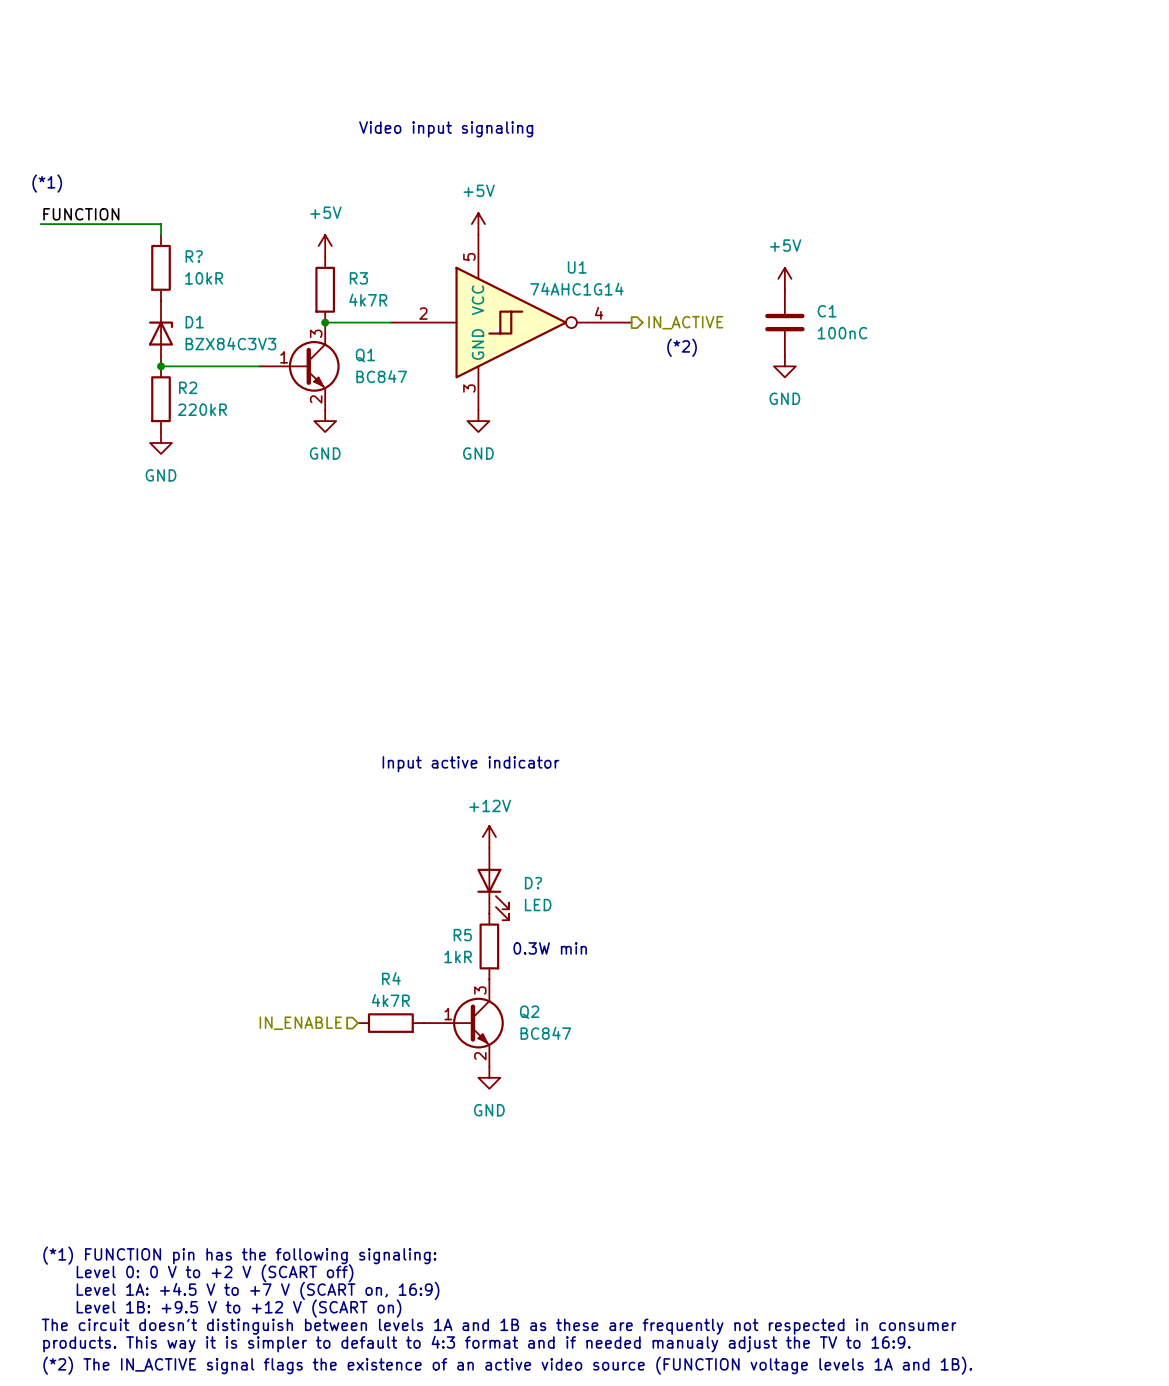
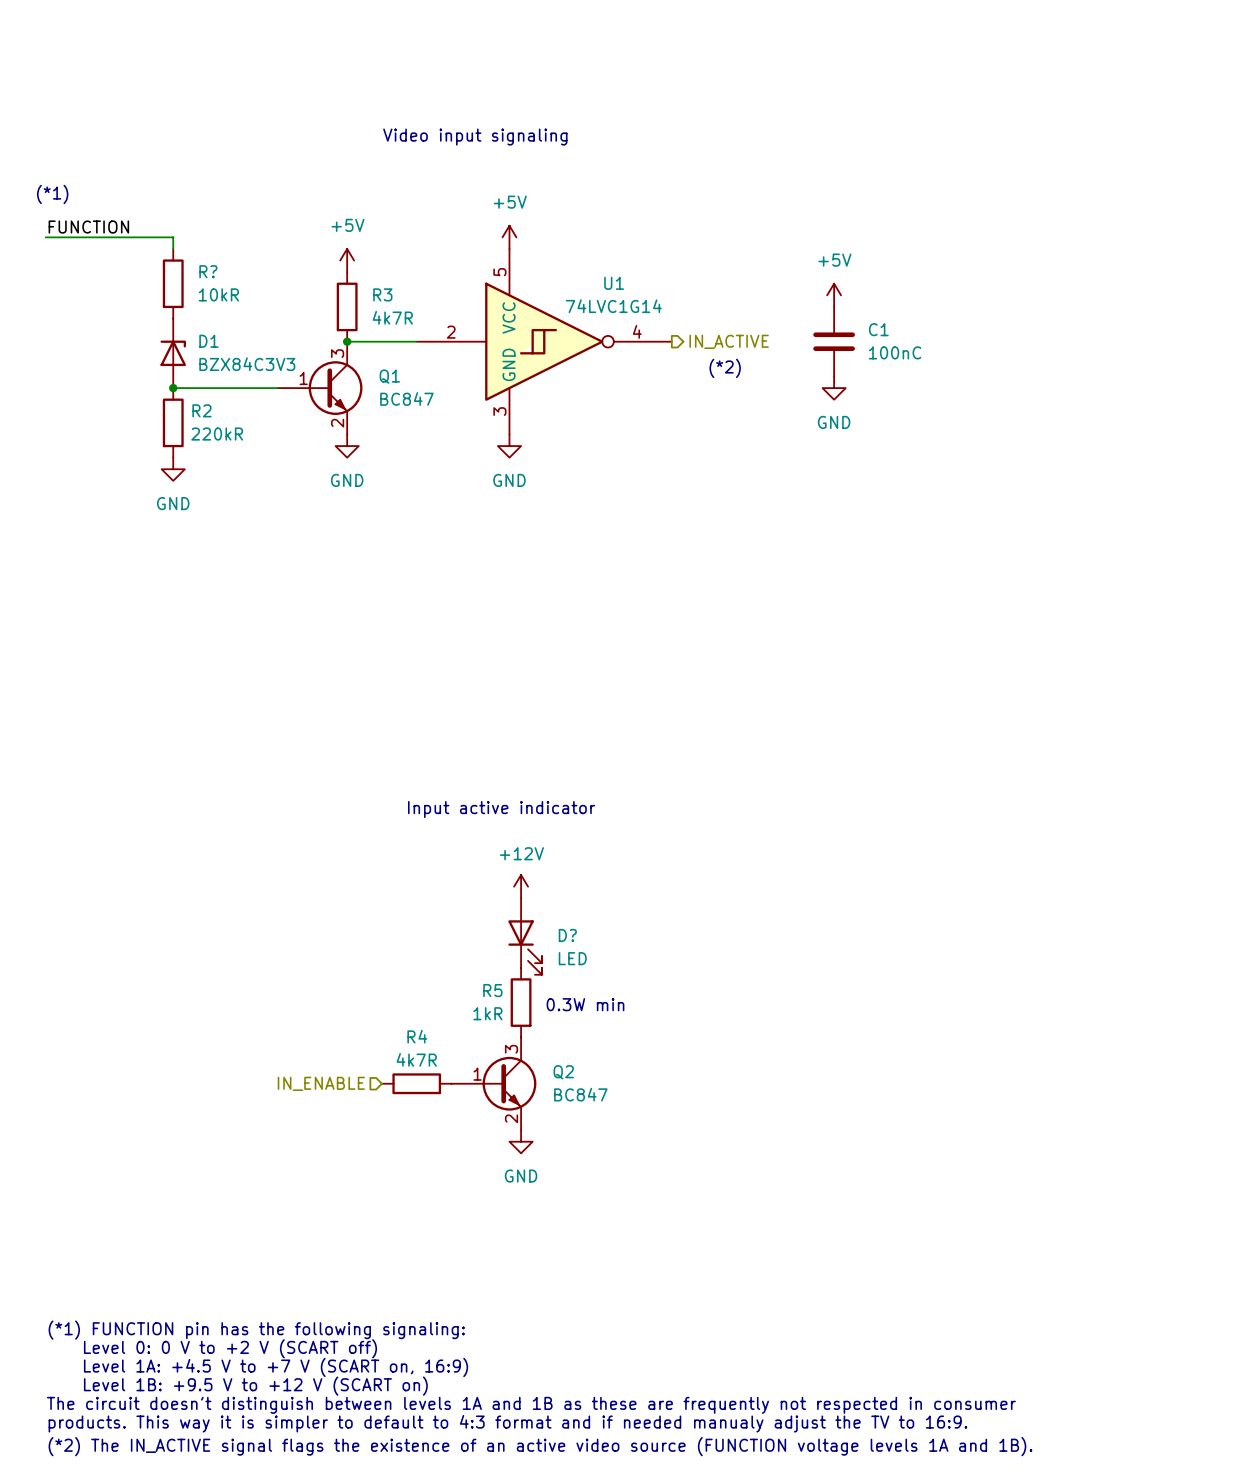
U1 value: 74AHC1G14 (576, 289) -> 74LVC1G14 (613, 306)

